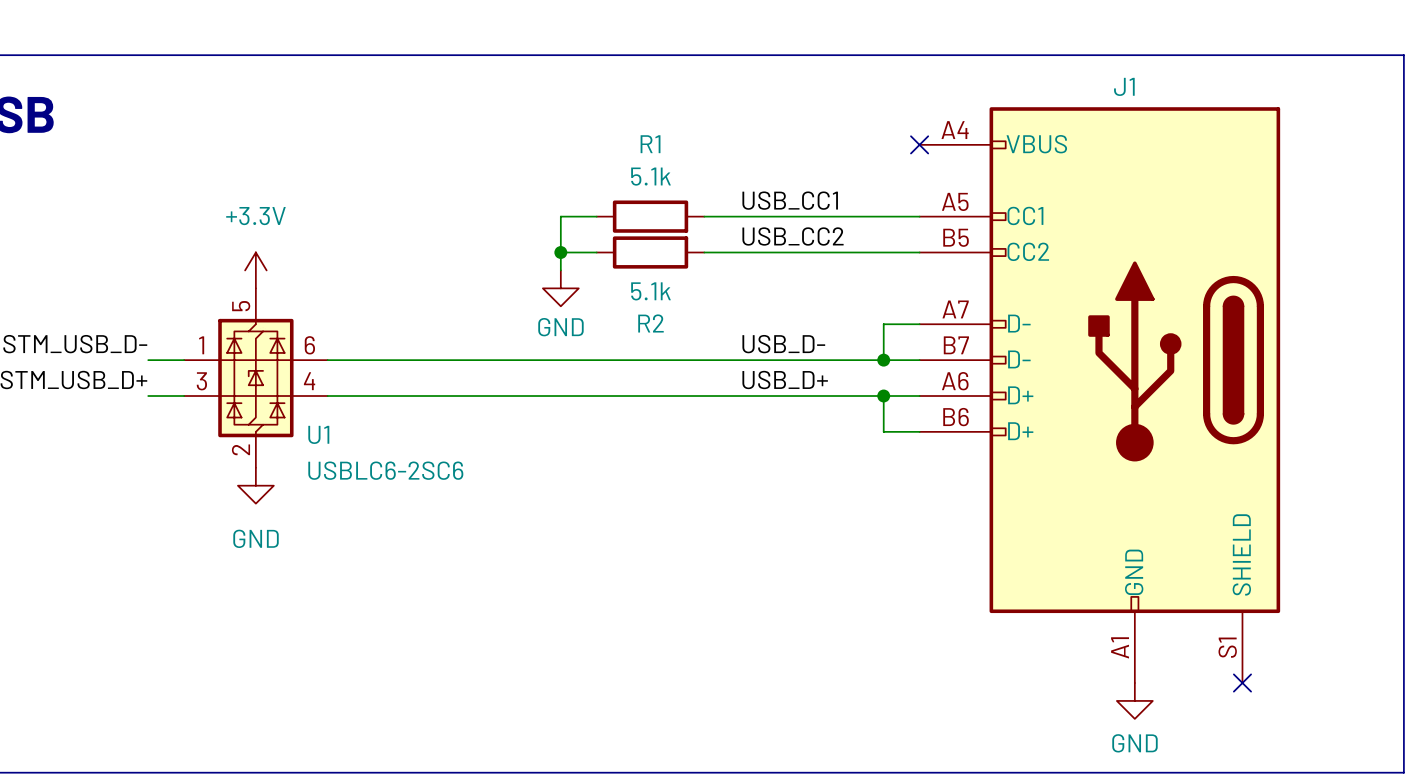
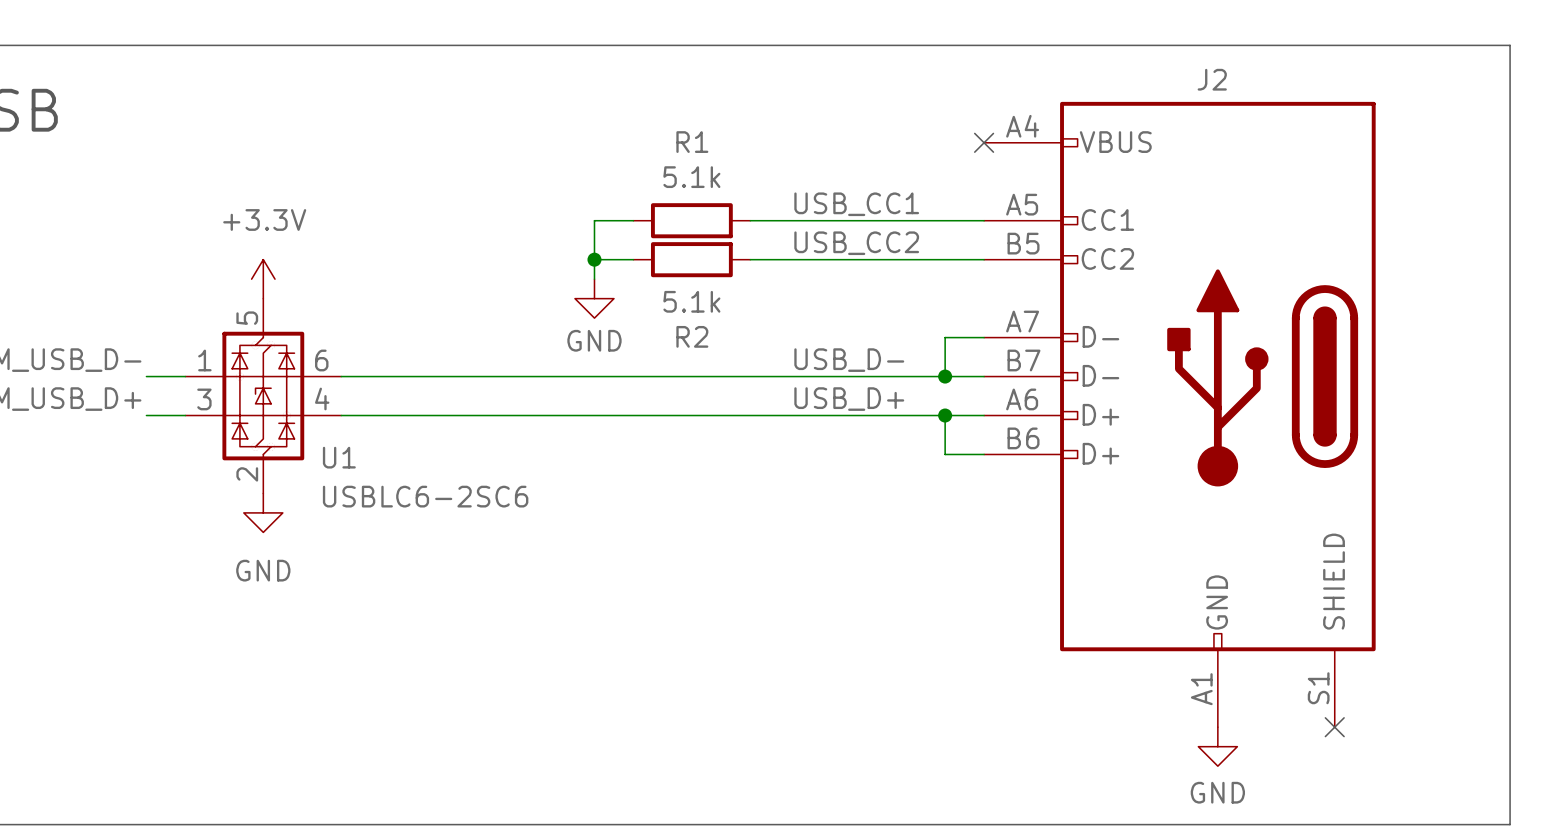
J1 name: J1 (1124, 86) -> J2 (1212, 79)

